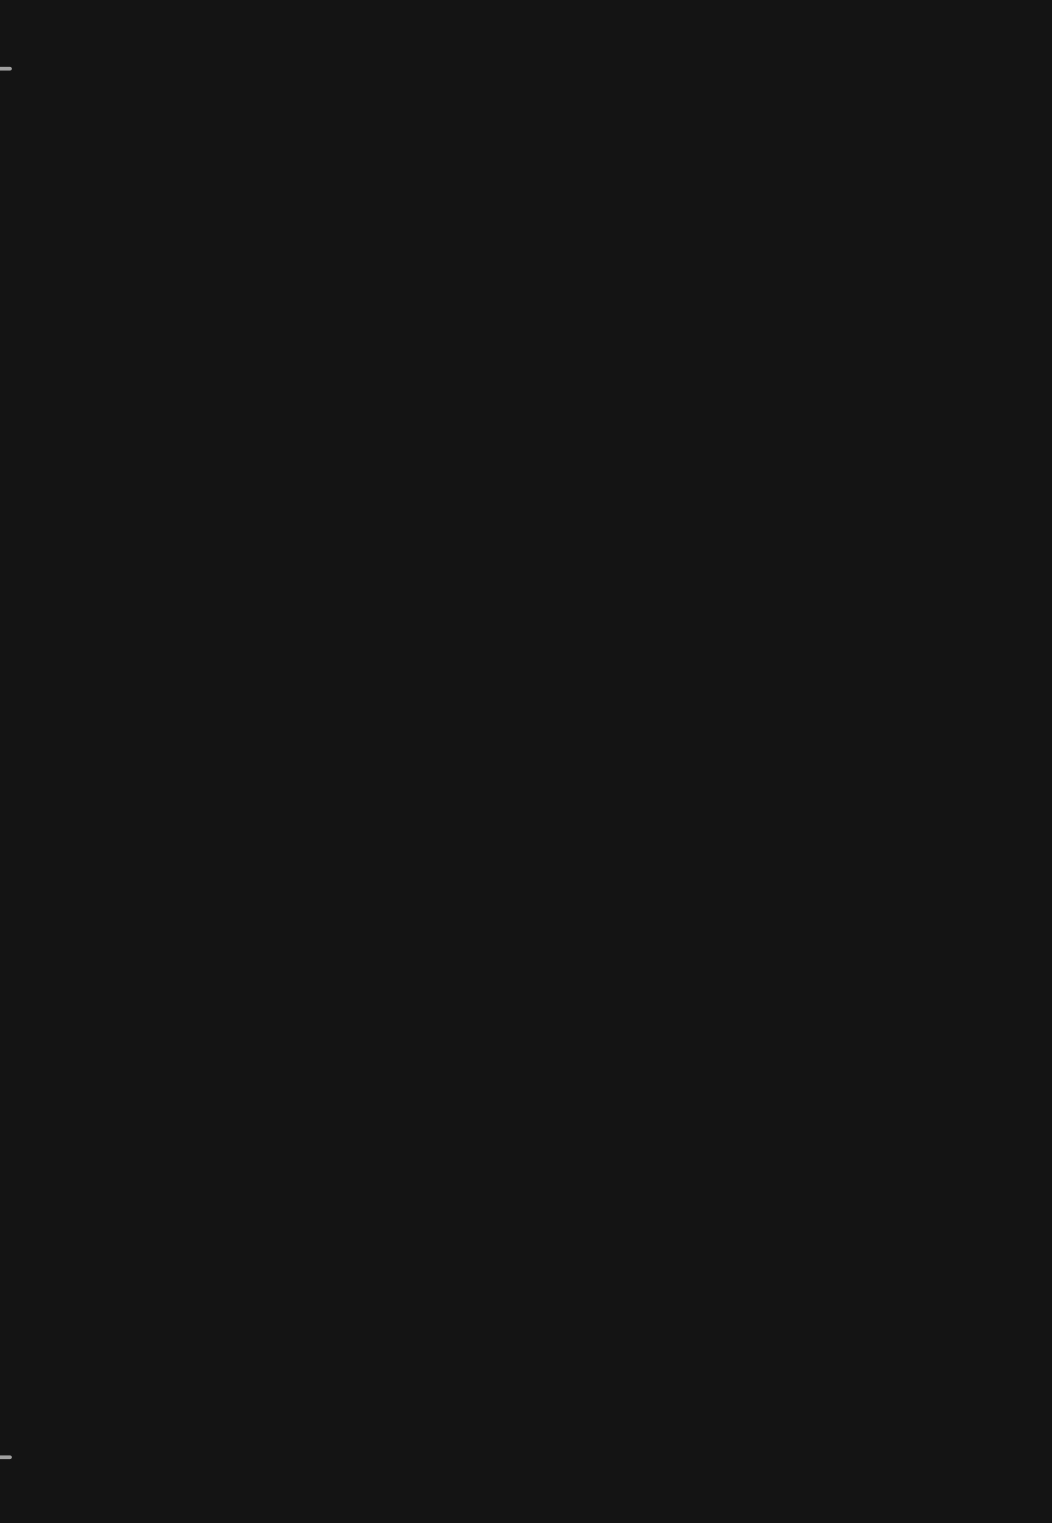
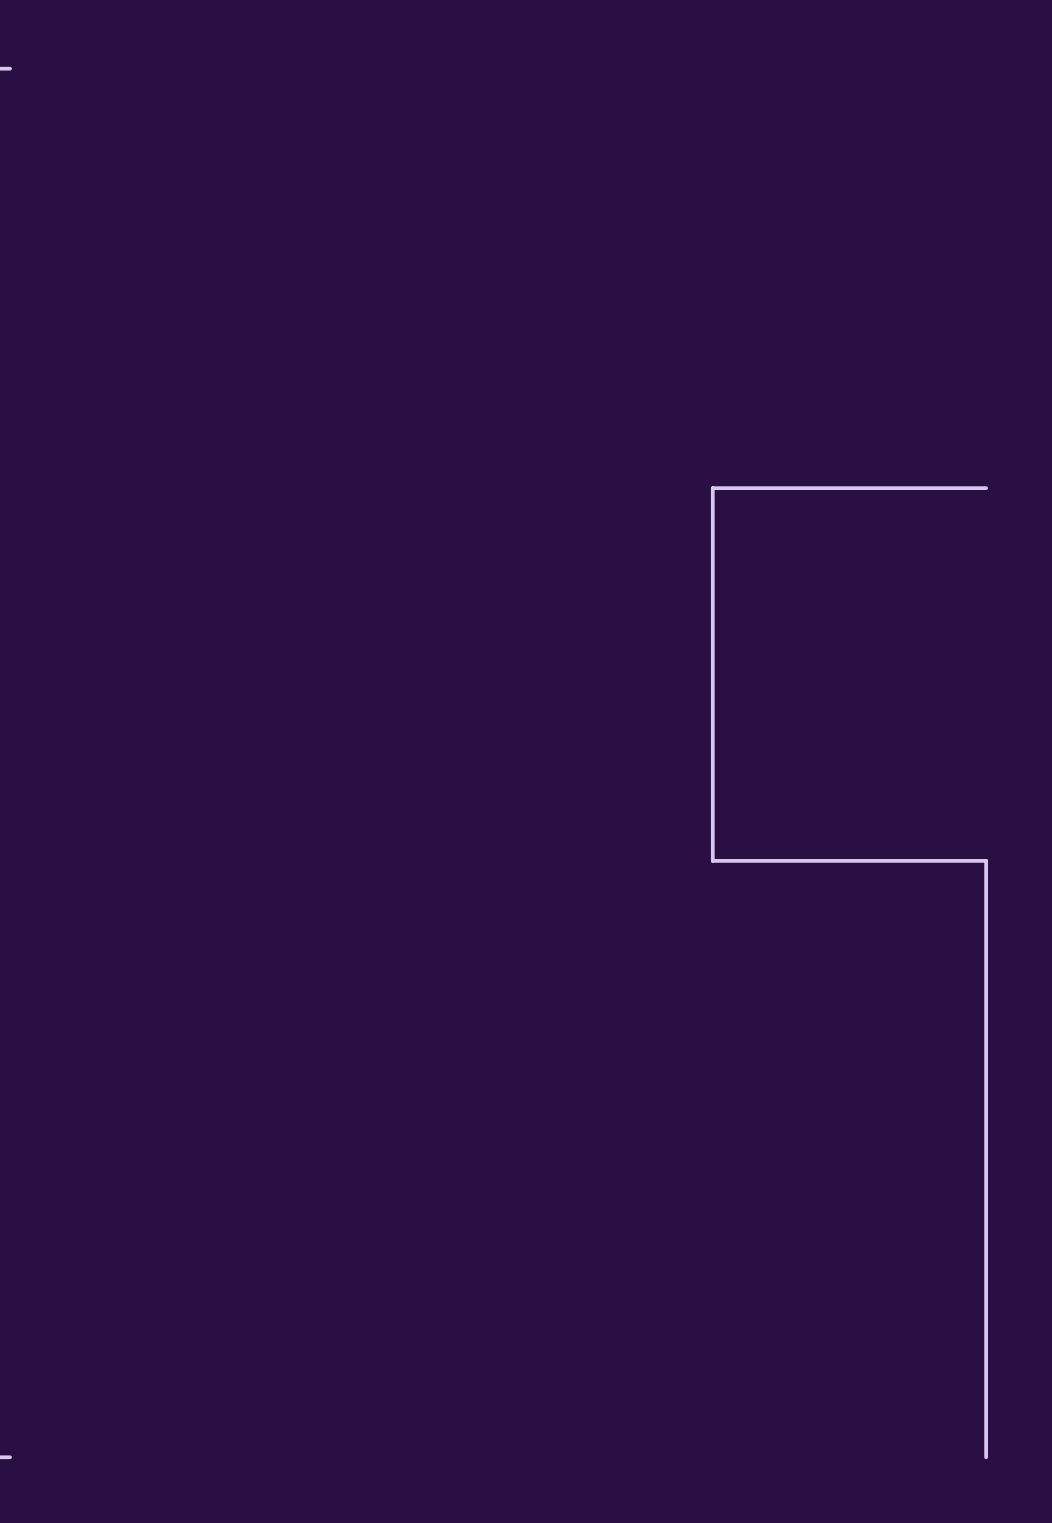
board edge: none -> (986, 488) (712, 488) (712, 860) (986, 860) (986, 1457)

